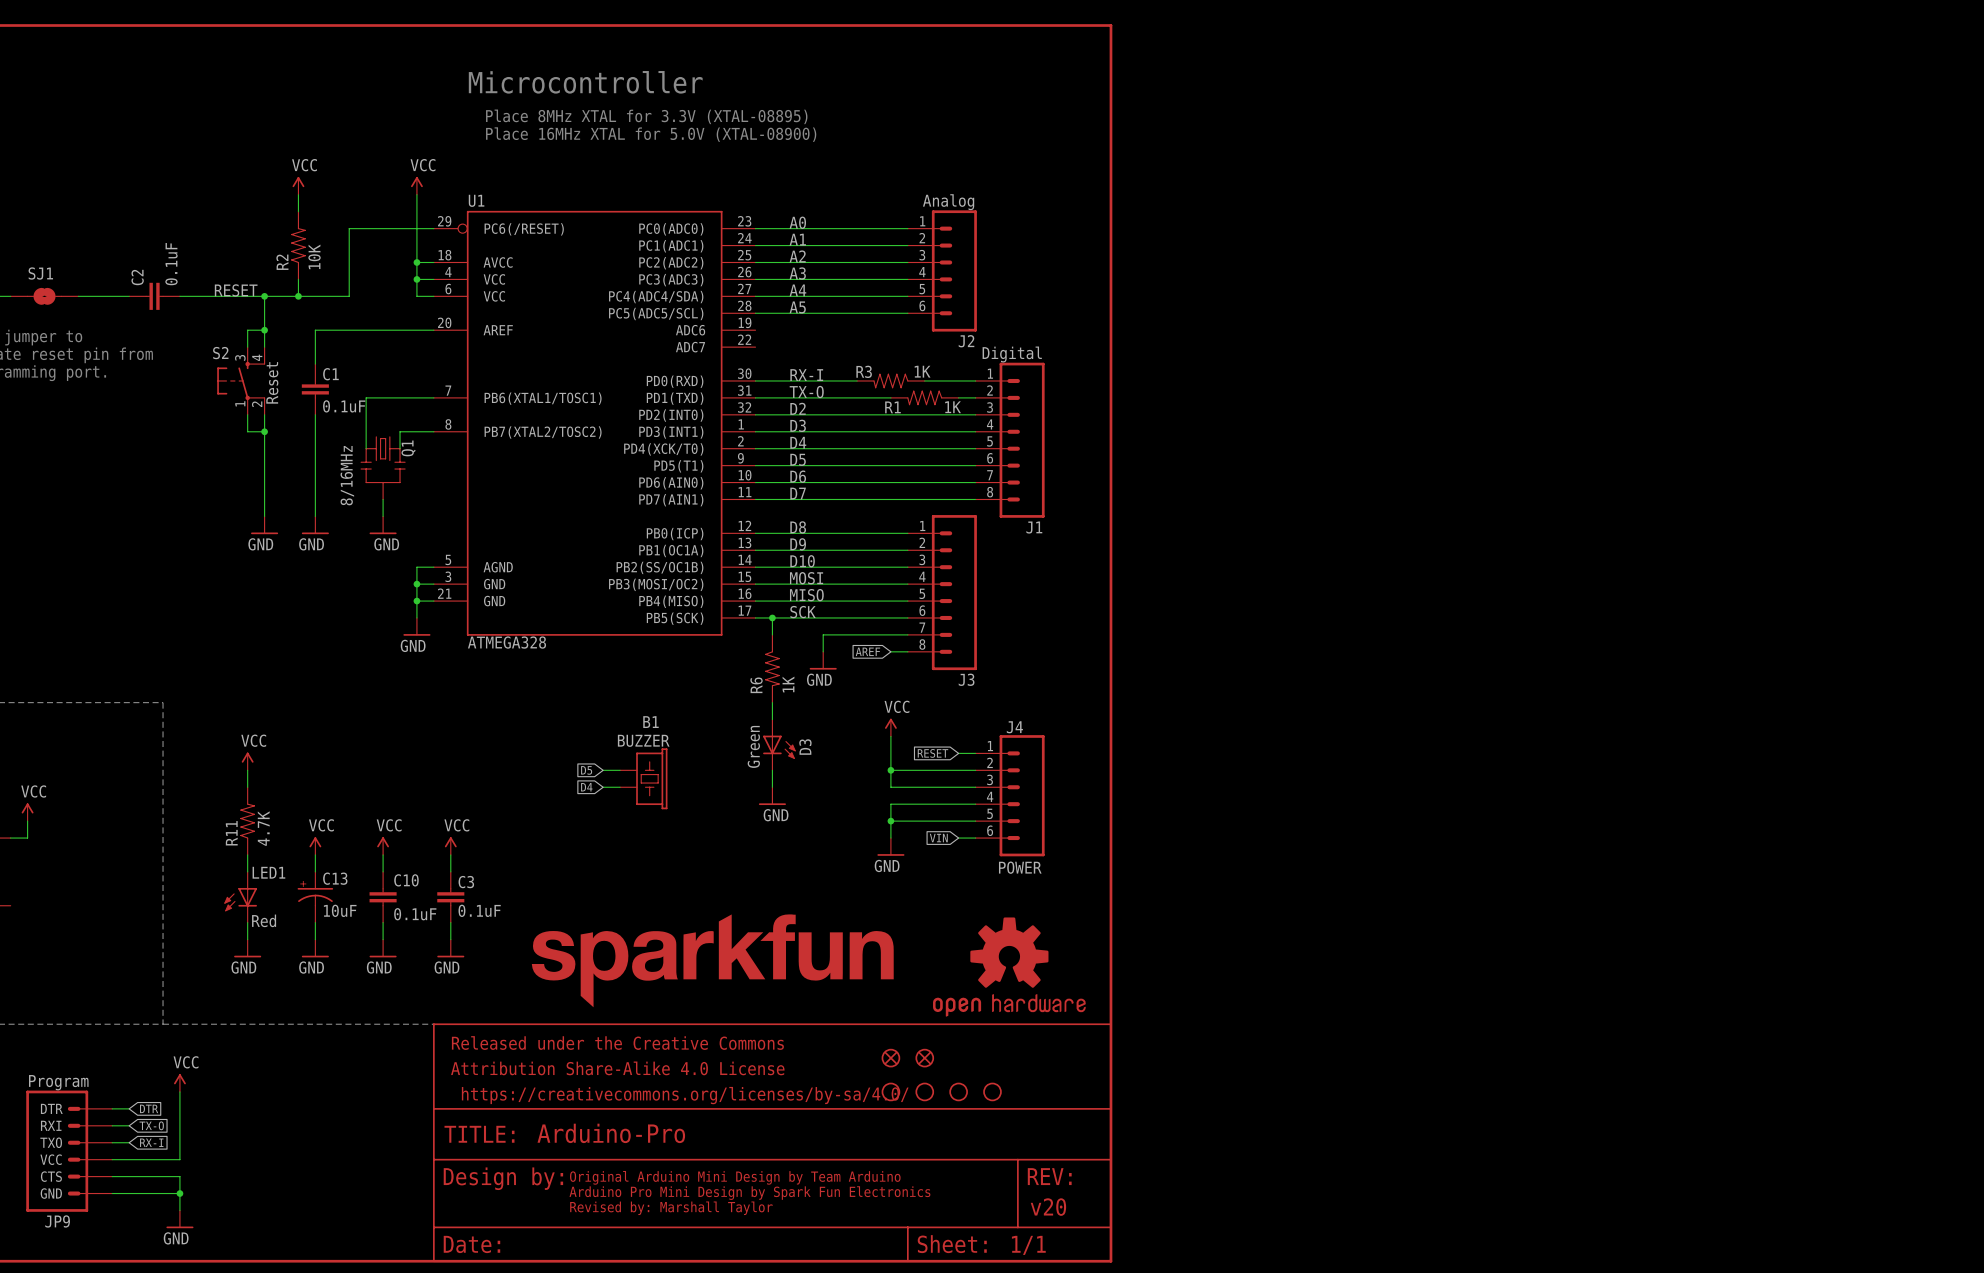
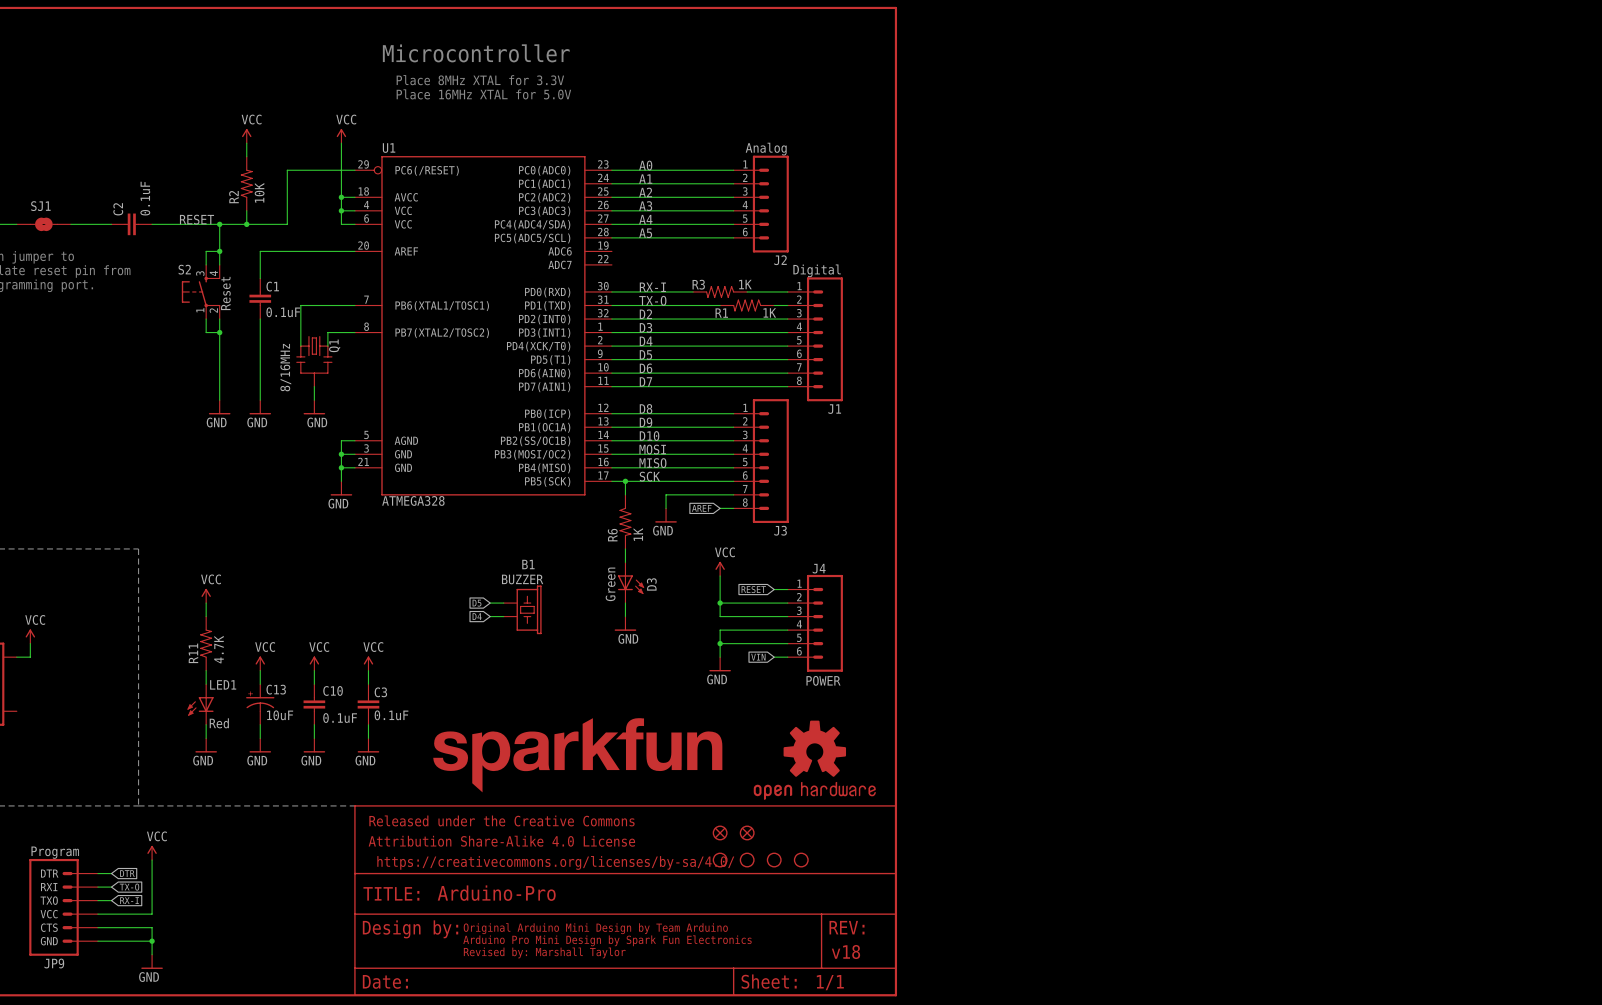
text: Place 8MHz XTAL for 3.3V (XTAL-08895) (646, 116) -> Place 8MHz XTAL for 3.3V (480, 80)
text: Place 16MHz XTAL for 5.0V (XTAL-08900) (651, 134) -> Place 16MHz XTAL for 5.0V (483, 94)
text: v20 (1048, 1207) -> v18 (845, 952)

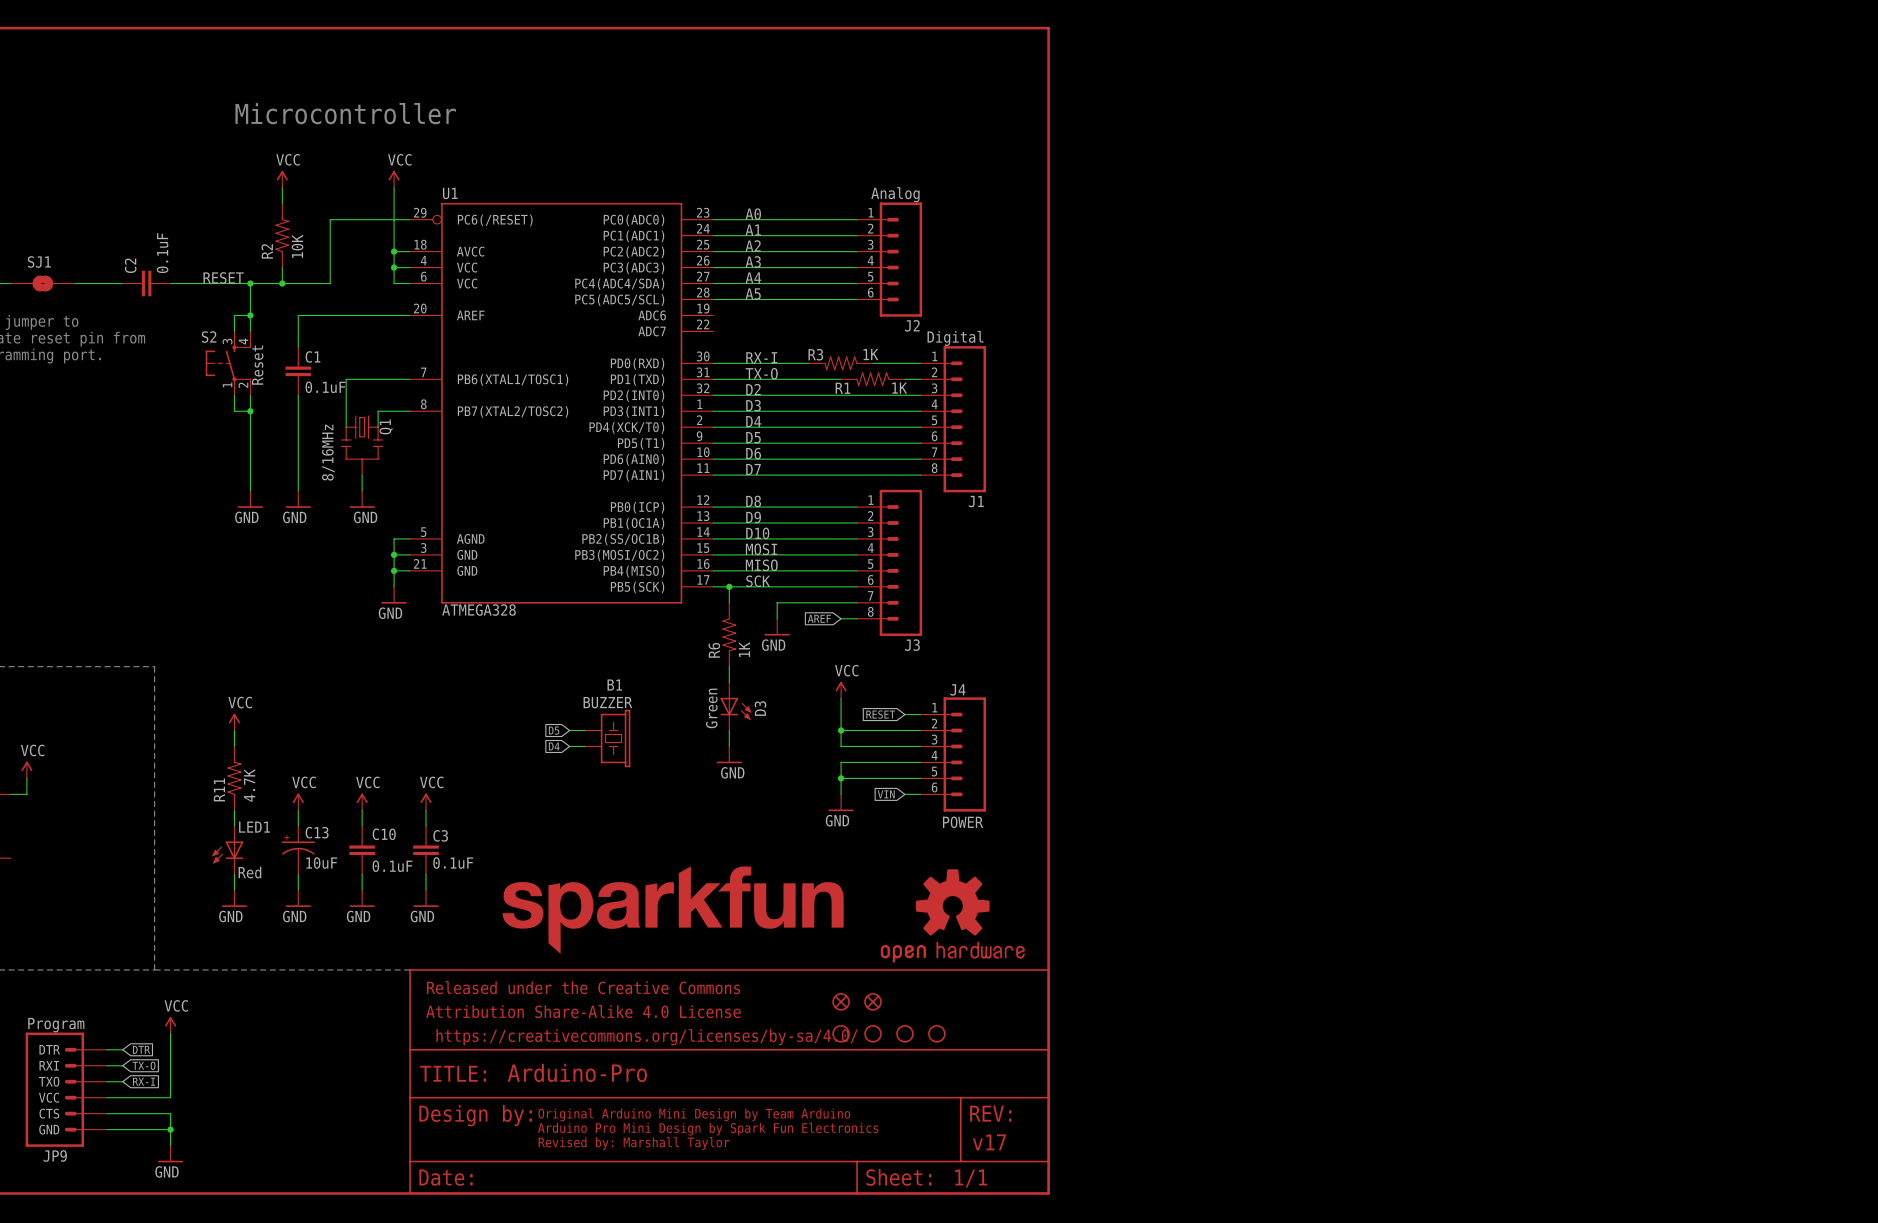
text: Microcontroller (476, 53) -> none
text: none -> Microcontroller (345, 113)
text: Place 8MHz XTAL for 3.3V (480, 80) -> none
text: Place 16MHz XTAL for 5.0V (483, 94) -> none
text: v18 (845, 952) -> v17 (989, 1142)

